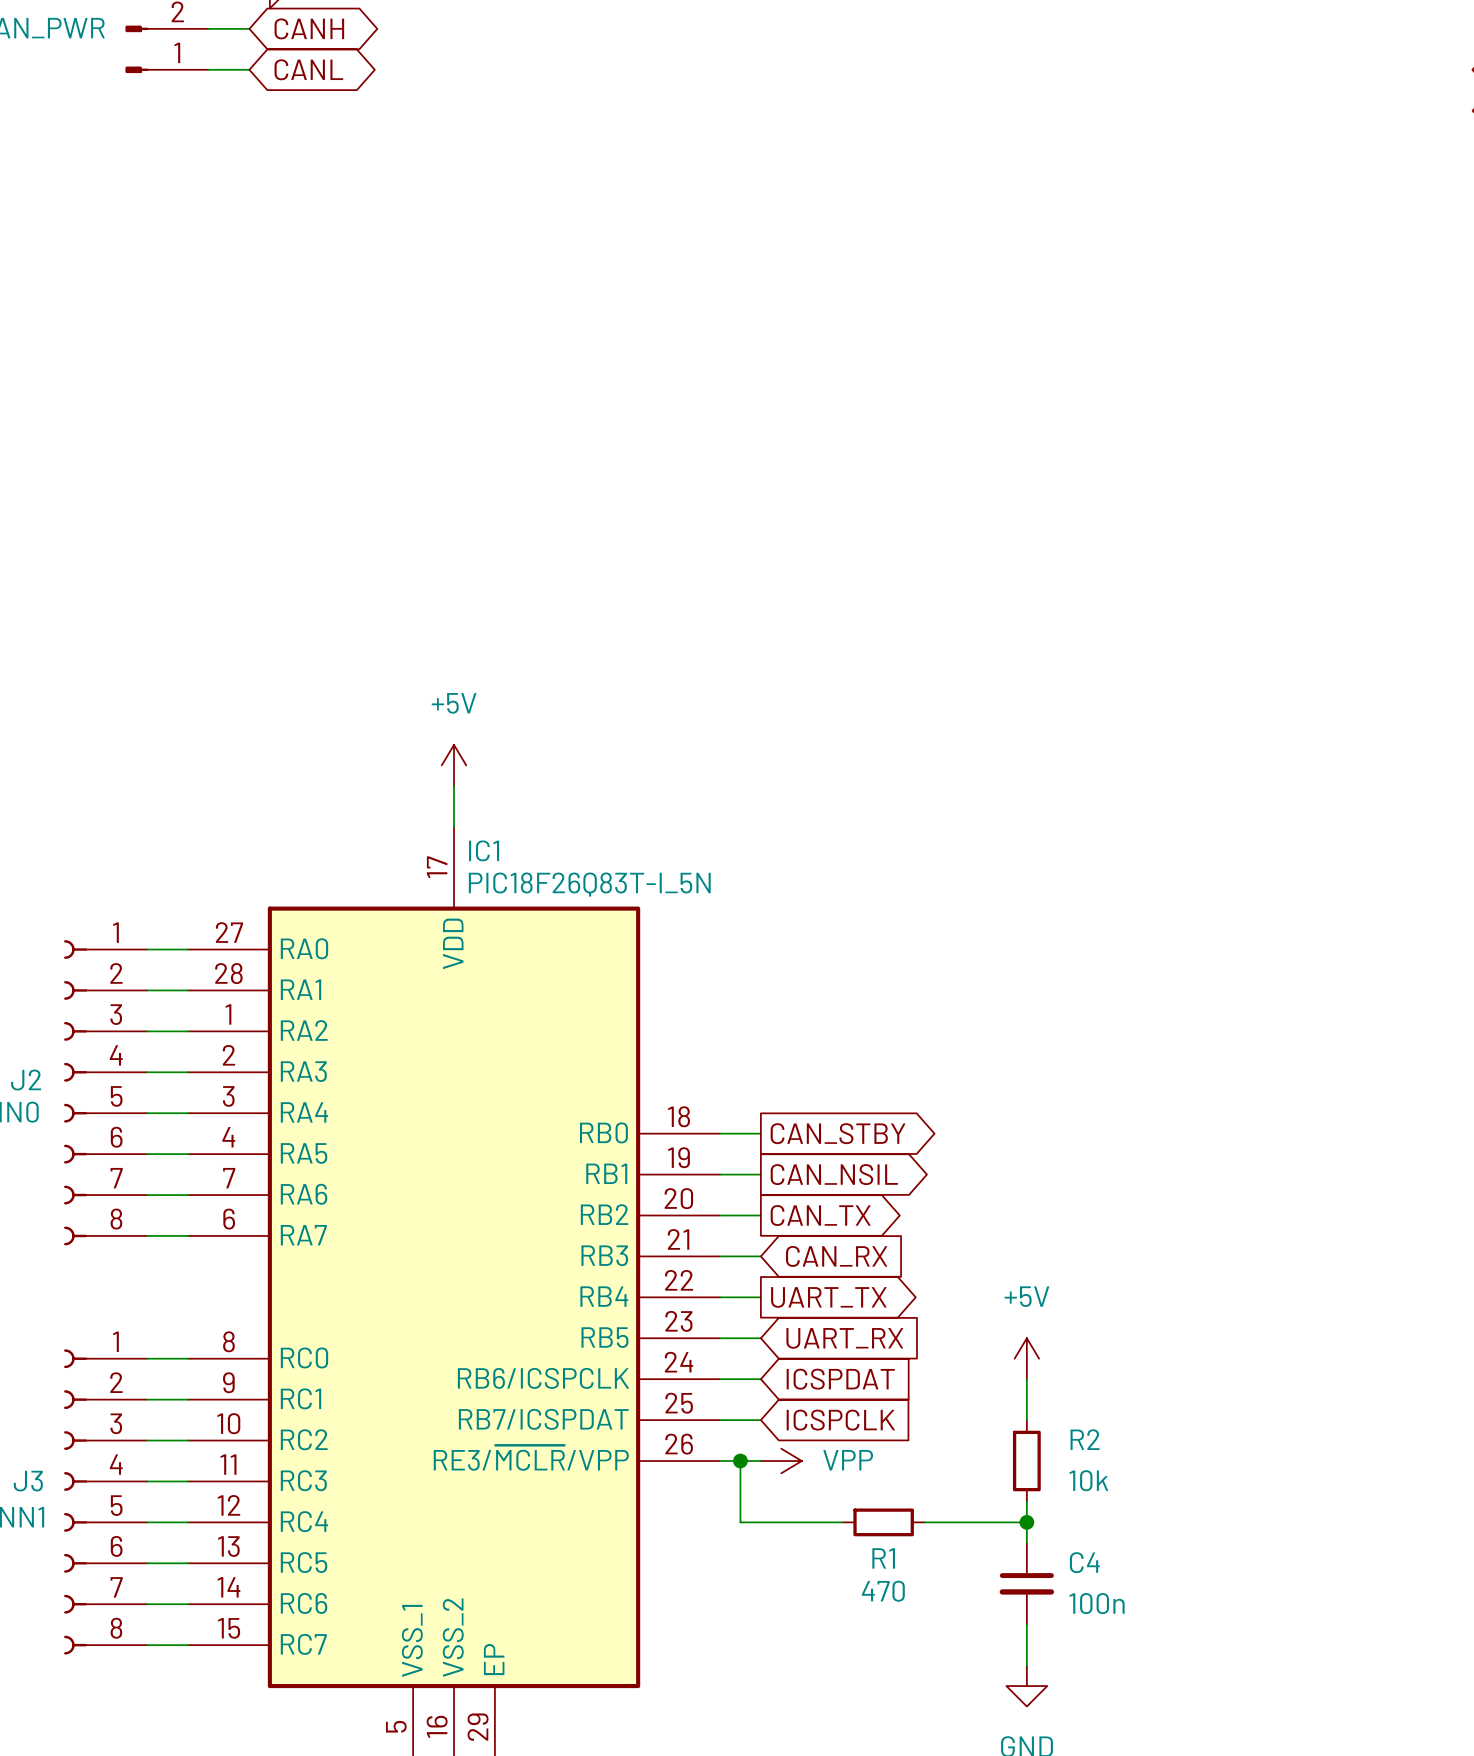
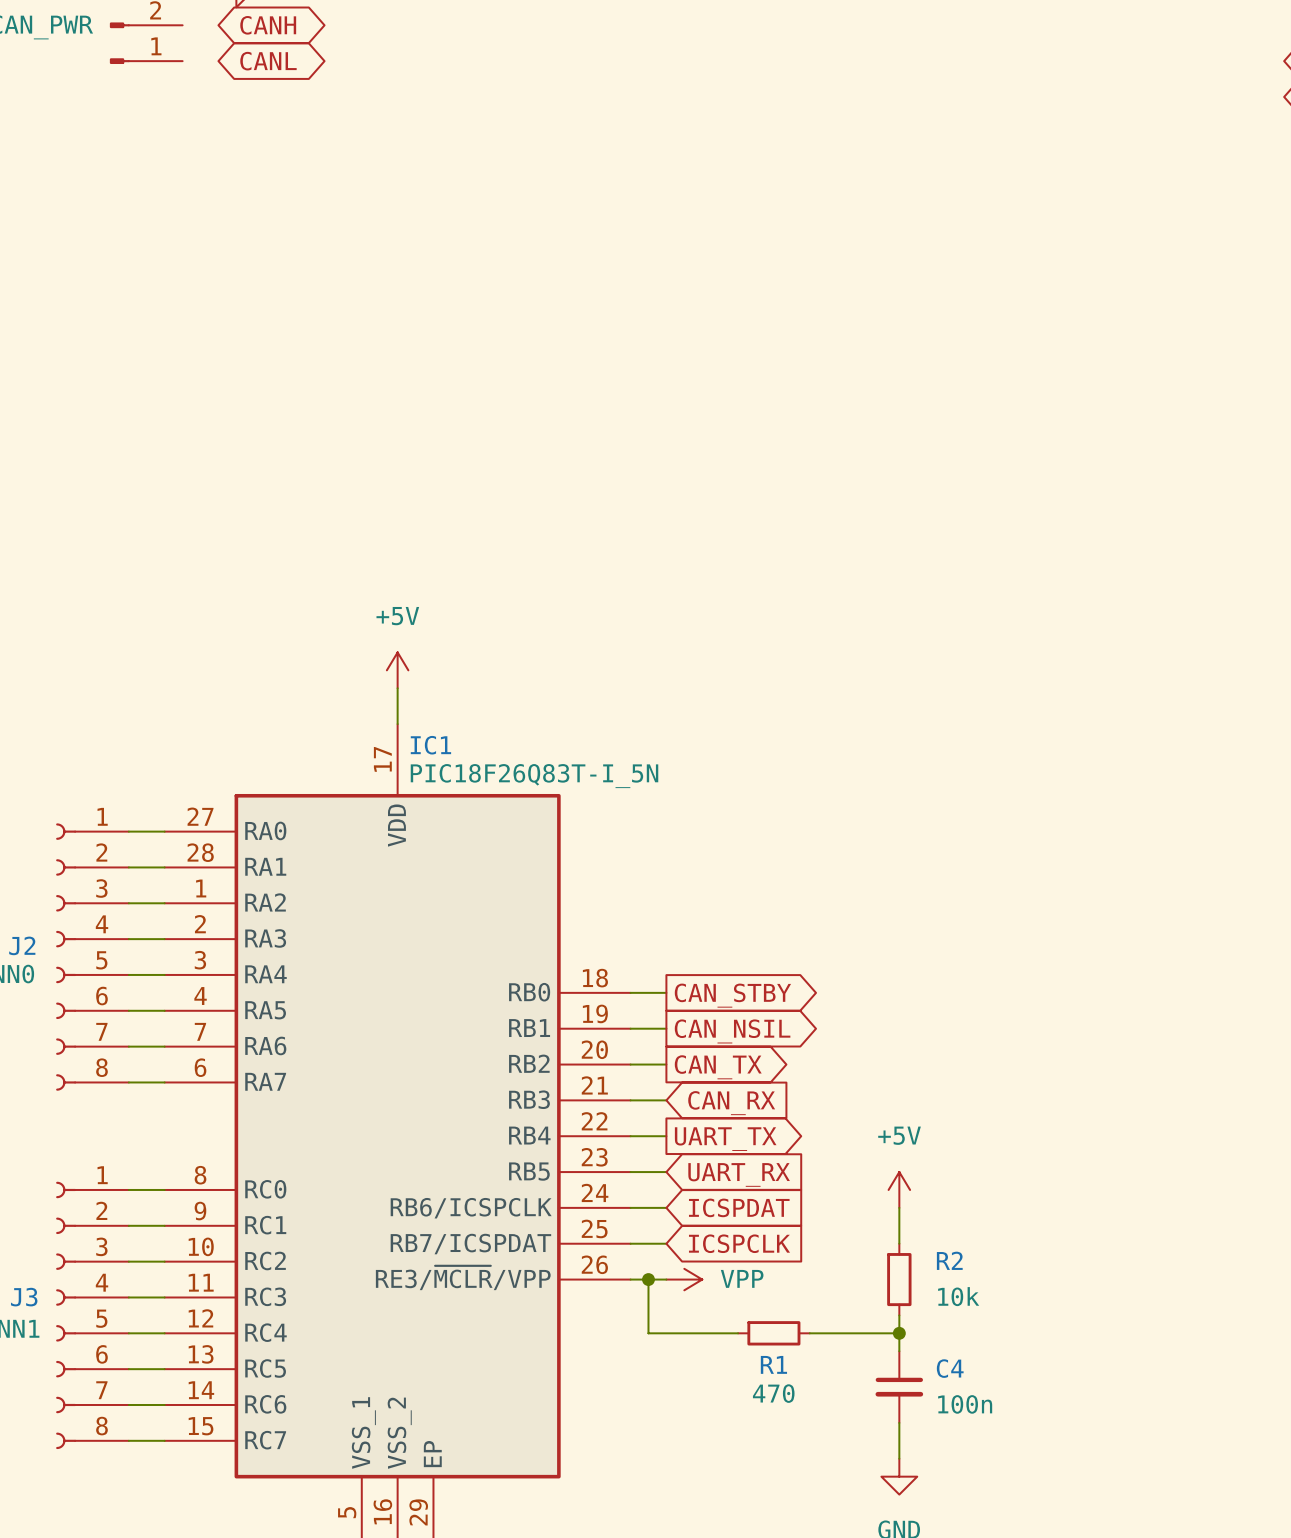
wire: (208, 28) (249, 28) -> none
wire: (208, 69) (249, 69) -> none

